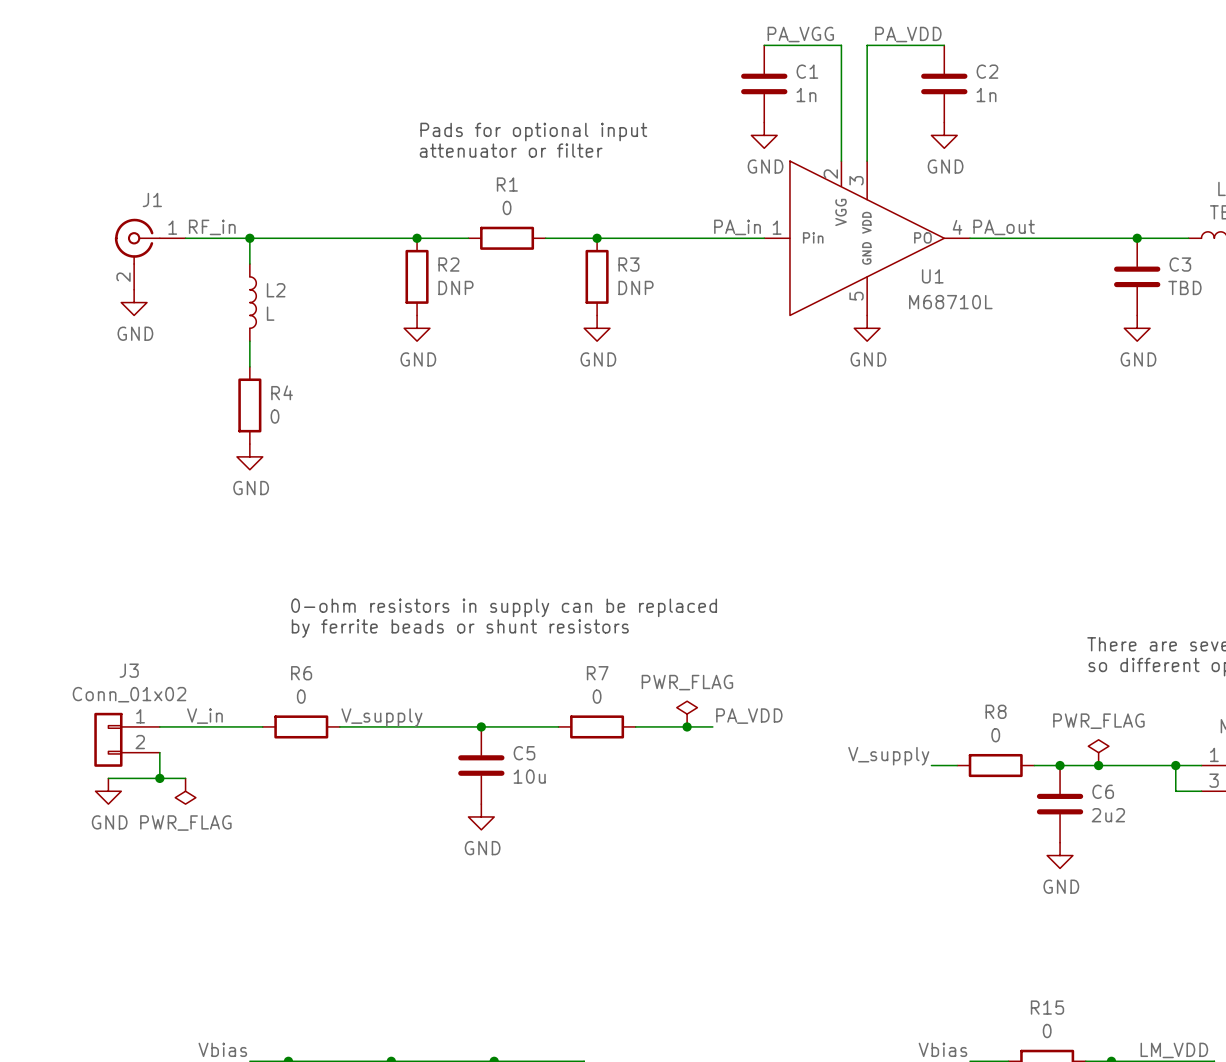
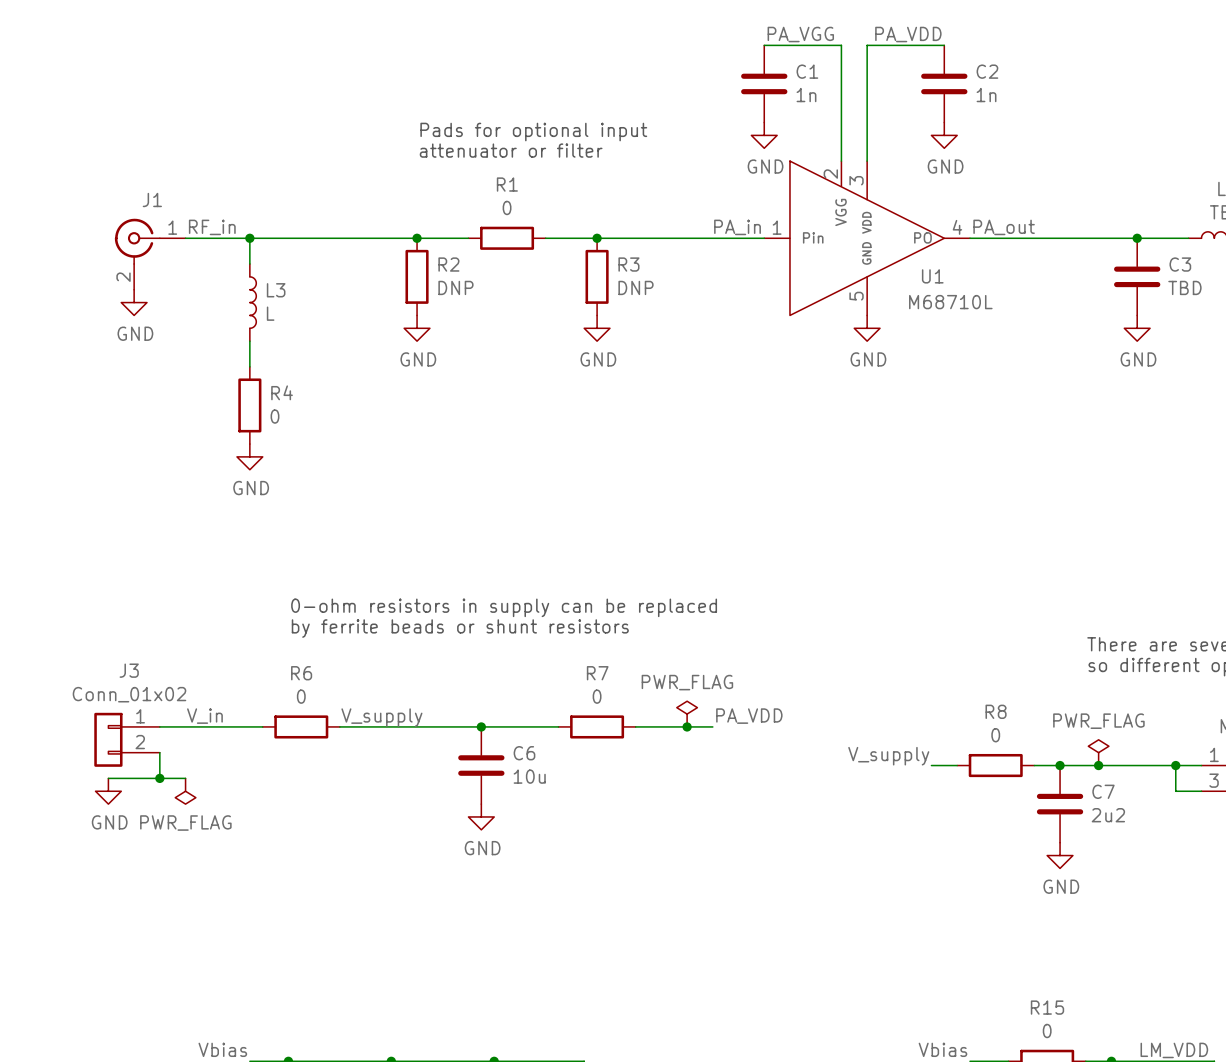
L2 name: L2 (276, 290) -> L3 (276, 290)
C5 name: C5 (524, 753) -> C6 (524, 753)
C6 name: C6 (1103, 791) -> C7 (1103, 791)

